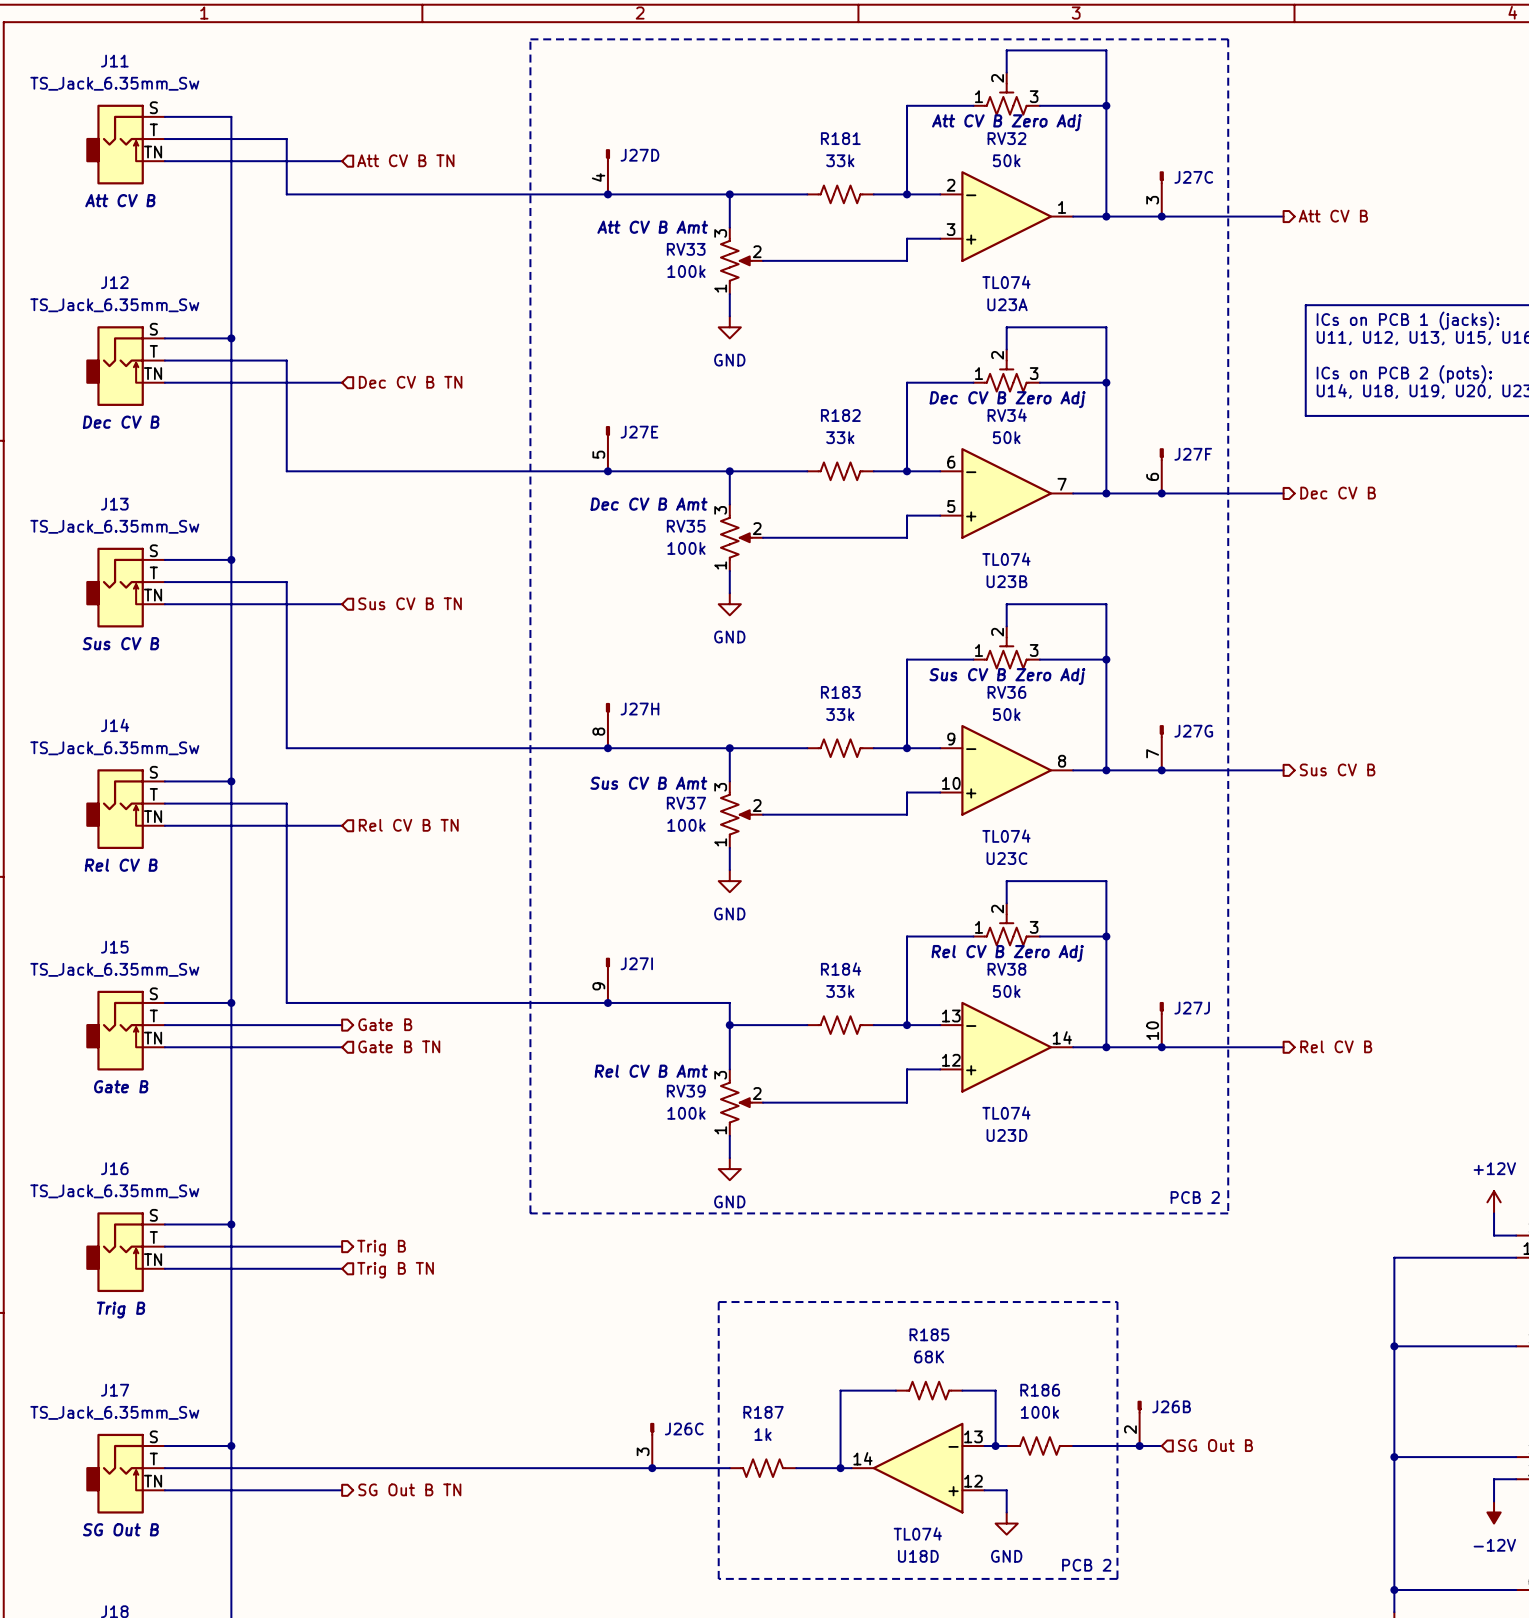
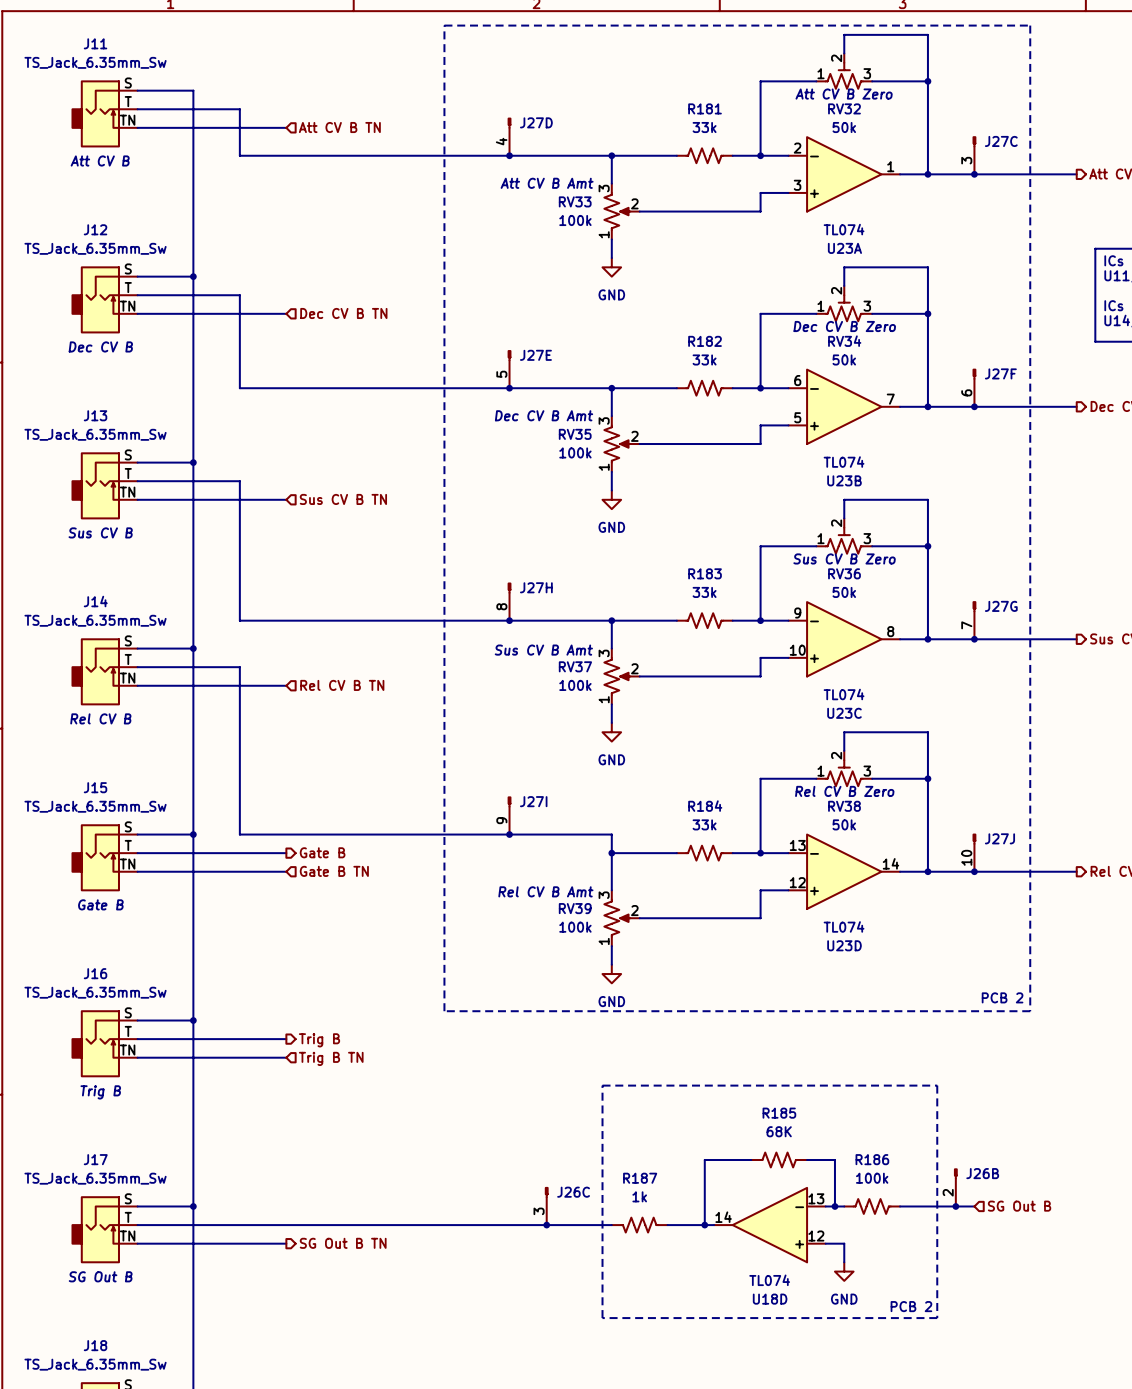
RV32 text: Att CV B Zero Adj (1006, 122) -> Att CV B Zero (844, 94)
RV34 text: Dec CV B Zero Adj (1007, 399) -> Dec CV B Zero (844, 326)
RV36 text: Sus CV B Zero Adj (1007, 676) -> Sus CV B Zero (844, 558)
RV38 text: Rel CV B Zero Adj (1007, 953) -> Rel CV B Zero (844, 791)

